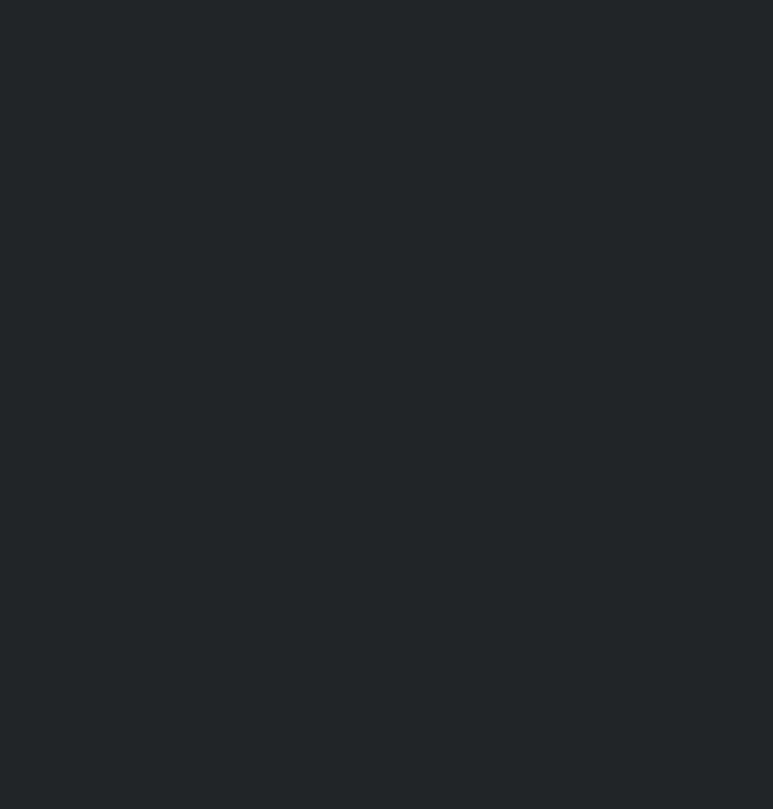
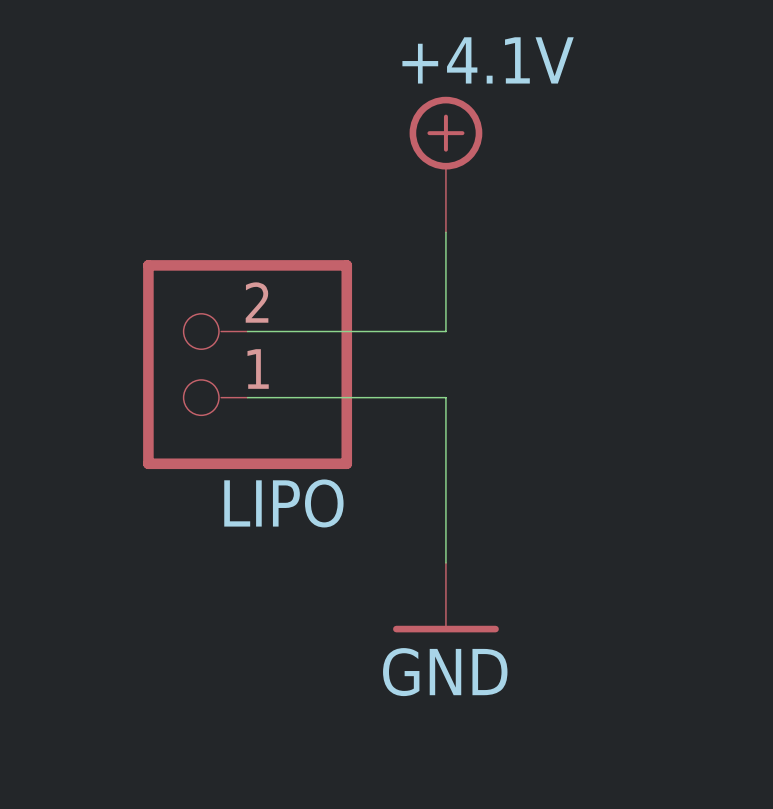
power symbol: none -> +4.1V (445, 164)
wire: none -> (445, 232) (445, 331) (247, 331)
LIPO: none -> (247, 364)
wire: none -> (247, 397) (445, 397) (445, 562)
power symbol: none -> GND (445, 597)

